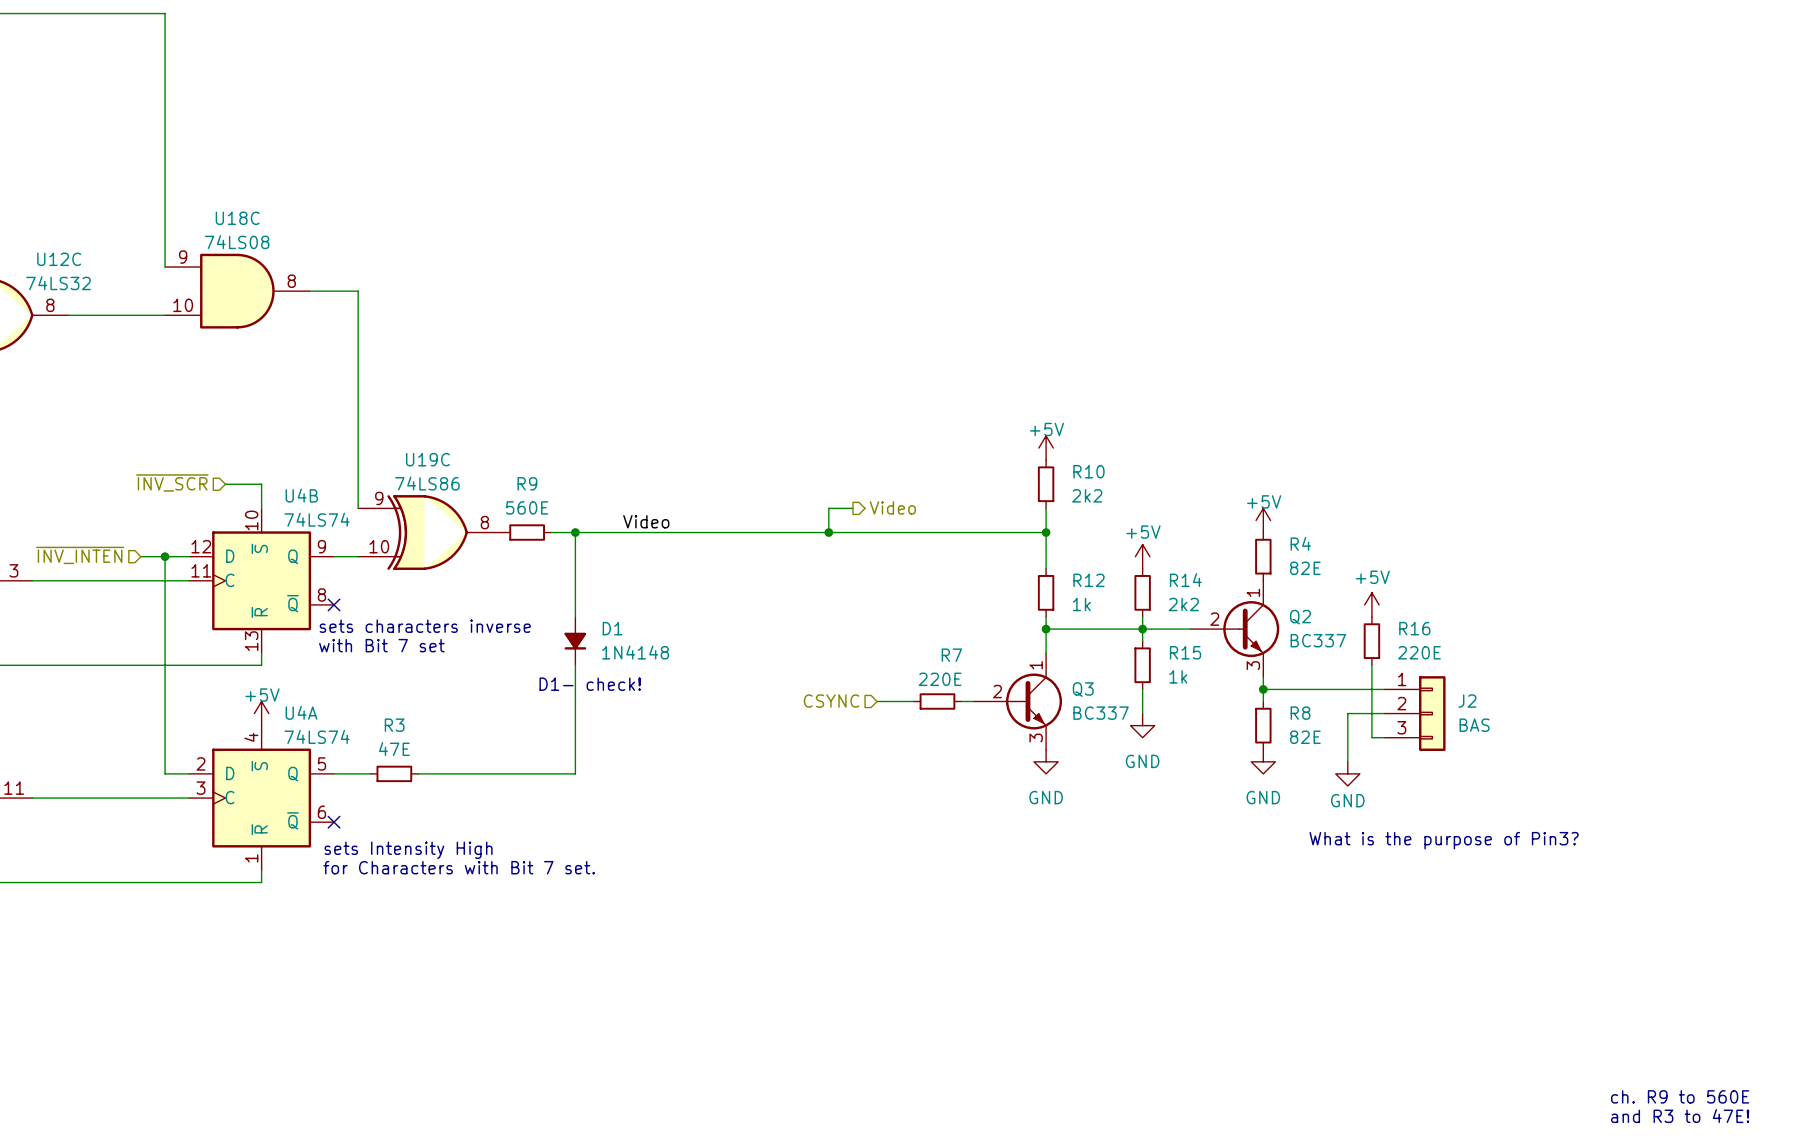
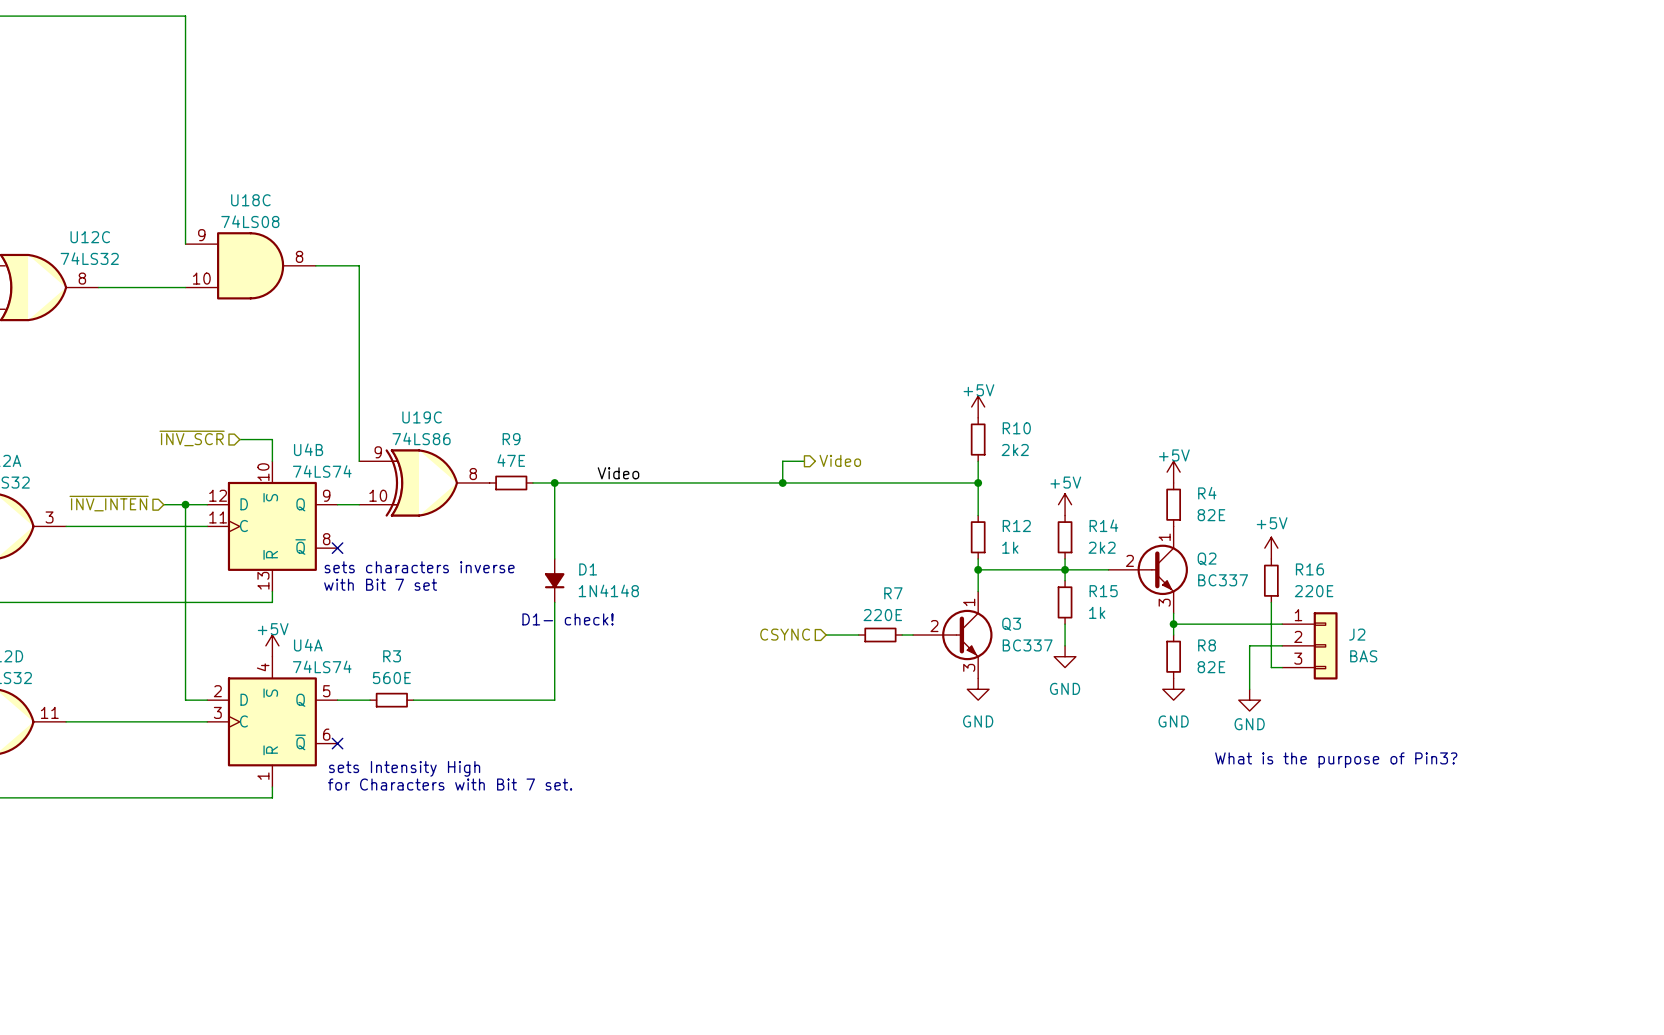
R9 value: 560E (527, 507) -> 47E (511, 460)
R3 value: 47E (394, 749) -> 560E (391, 678)
text: ch. R9 to 560E (1680, 1096) -> none
text: and R3 to 47E! (1680, 1116) -> none

